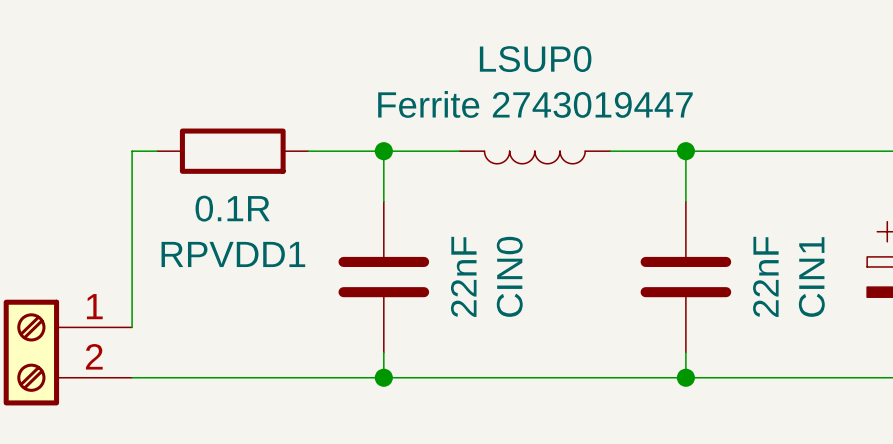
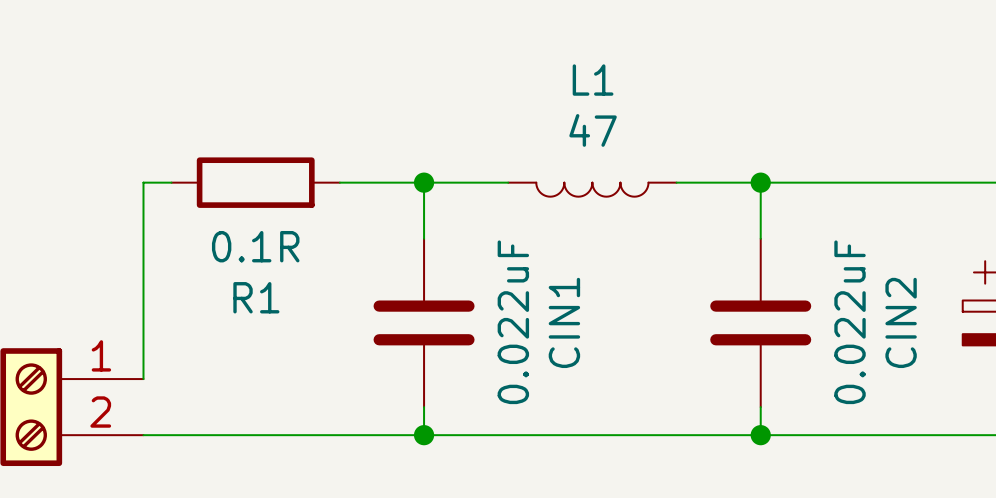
LSUP0 name: LSUP0 (535, 59) -> L1 (593, 80)
LSUP0 value: Ferrite 2743019447 (535, 104) -> 47 (593, 130)
RPVDD1 name: RPVDD1 (233, 254) -> R1 (256, 297)
CIN0 value: 22nF (463, 276) -> 0.022uF (513, 322)
CIN0 name: CIN0 (509, 276) -> CIN1 (564, 322)
CIN1 value: 22nF (765, 276) -> 0.022uF (850, 322)
CIN1 name: CIN1 (811, 277) -> CIN2 (901, 322)

